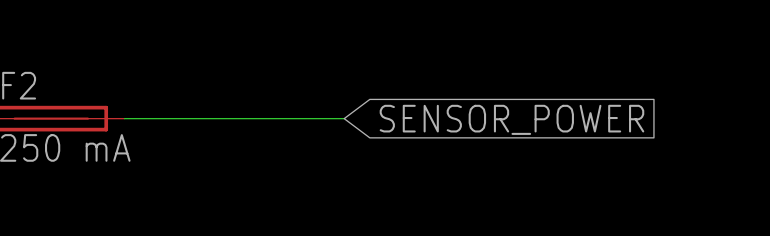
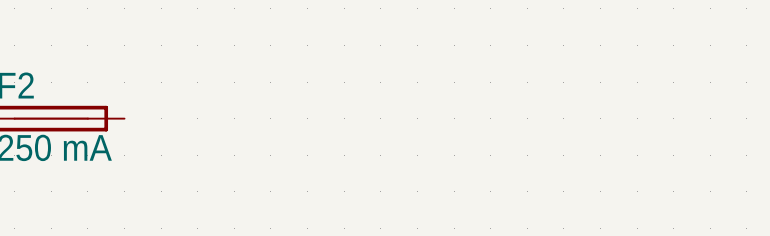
wire: (124, 118) (344, 118) -> none
global label: SENSOR_POWER (511, 119) -> none

